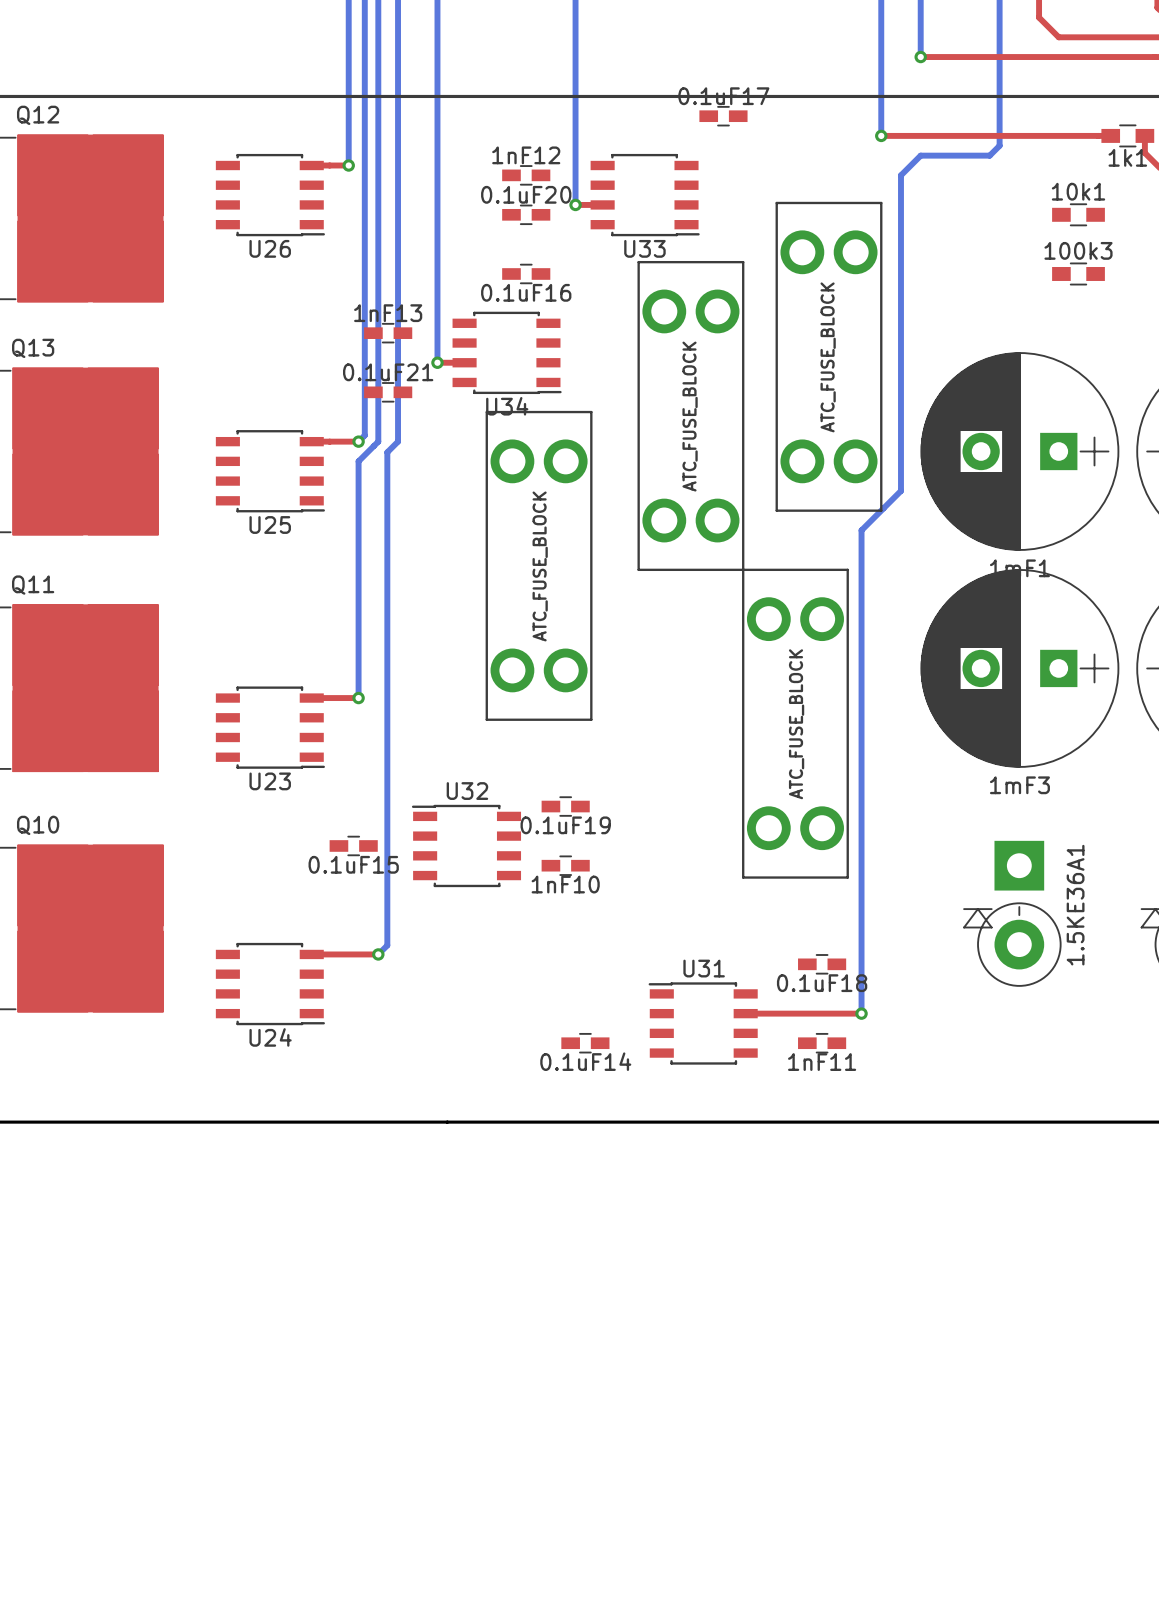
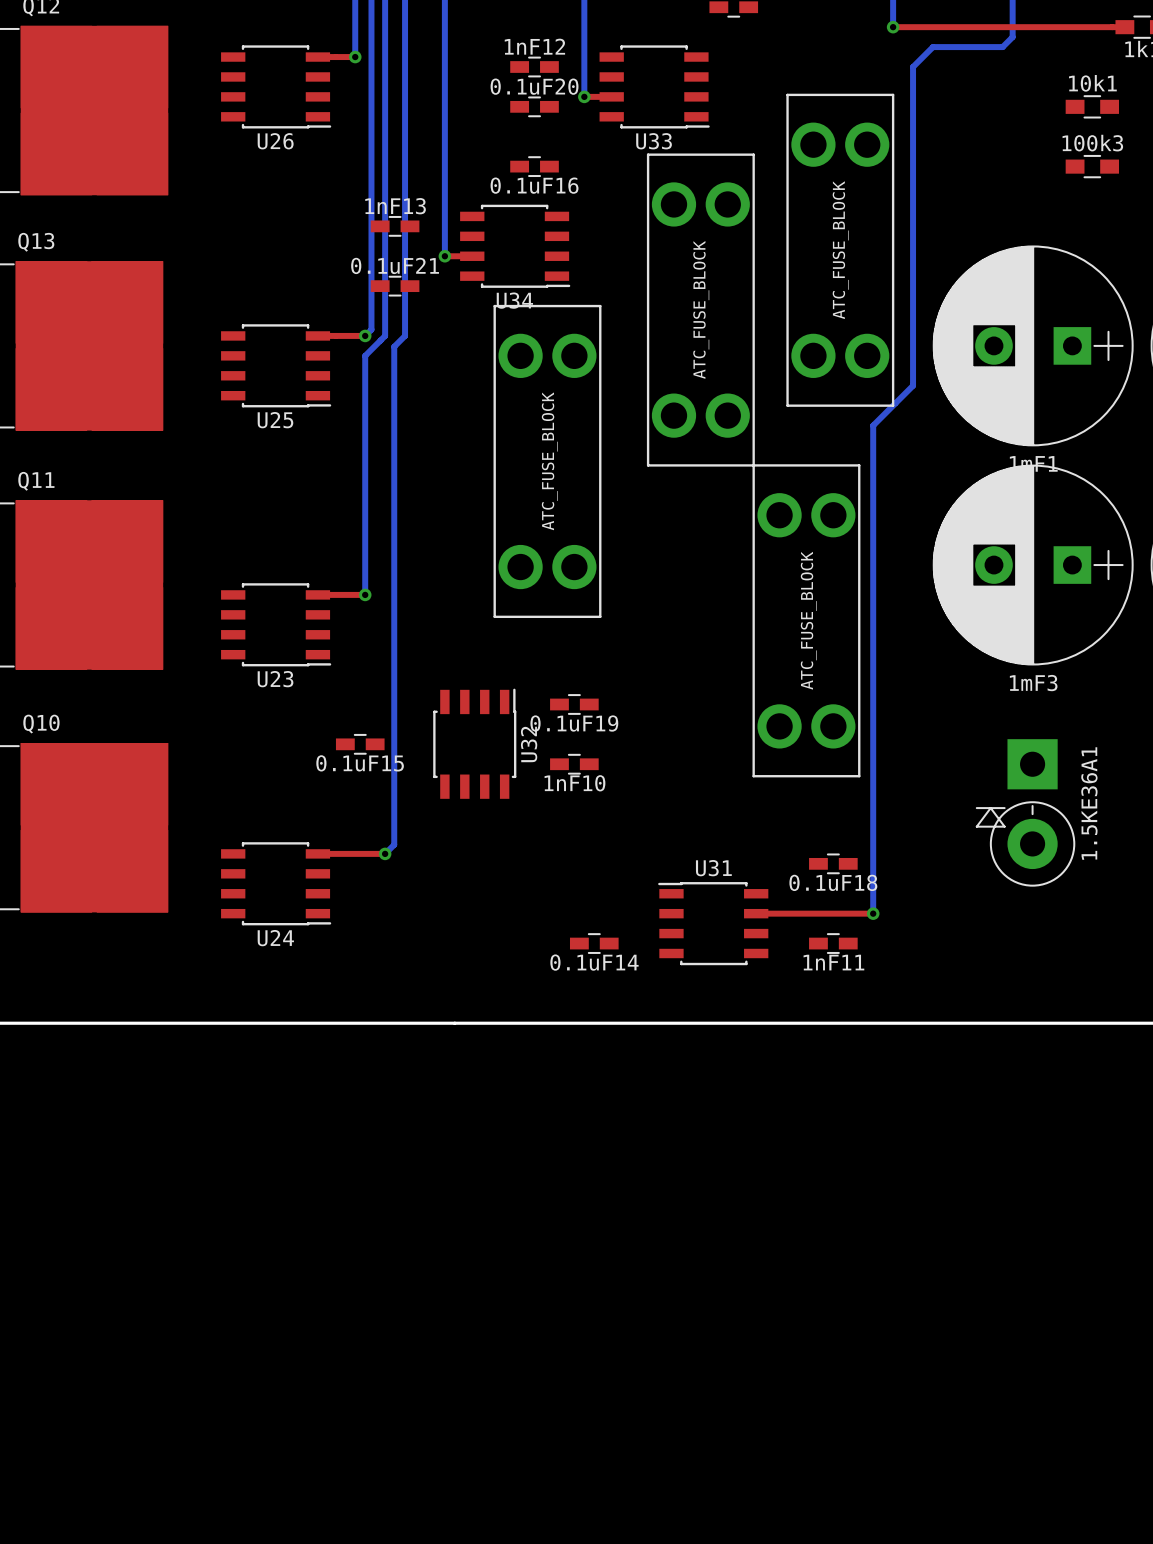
U32 rotation: 0° (466, 845) -> 90° clockwise (474, 743)

